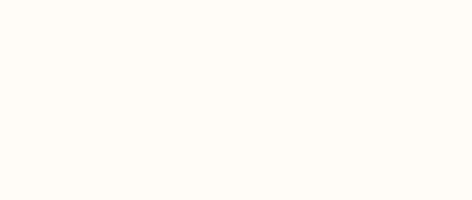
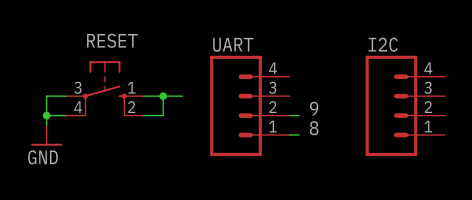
RESET: none -> (104, 88)
wire: none -> (66, 96) (46, 96) (46, 125)
wire: none -> (143, 96) (182, 96)
wire: none -> (163, 96) (163, 115) (143, 115)
junction: none -> (163, 96)
UART: none -> (249, 105)
I2C: none -> (405, 105)
label: none -> 9 (314, 108)
wire: none -> (46, 115) (66, 115)
junction: none -> (46, 115)
wire: none -> (289, 115) (299, 115)
label: none -> 8 (314, 128)
power symbol: none -> GND (46, 135)
wire: none -> (289, 135) (299, 135)

